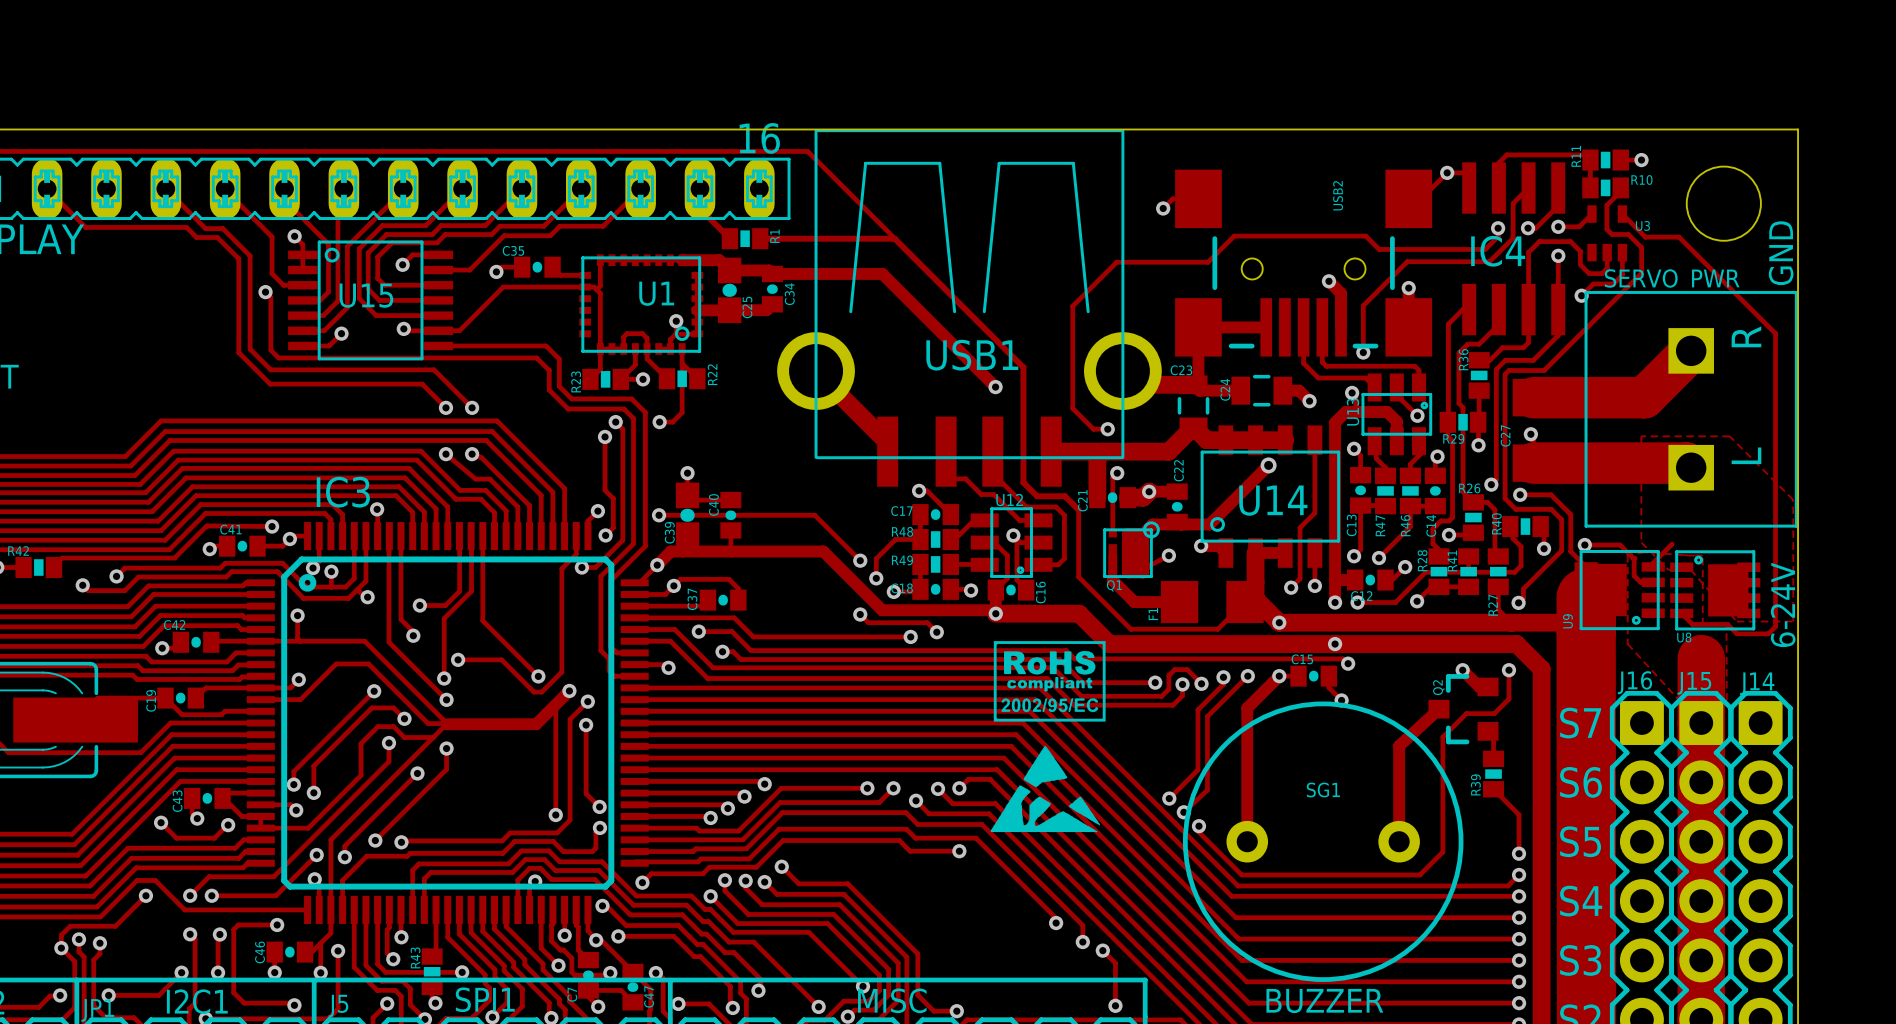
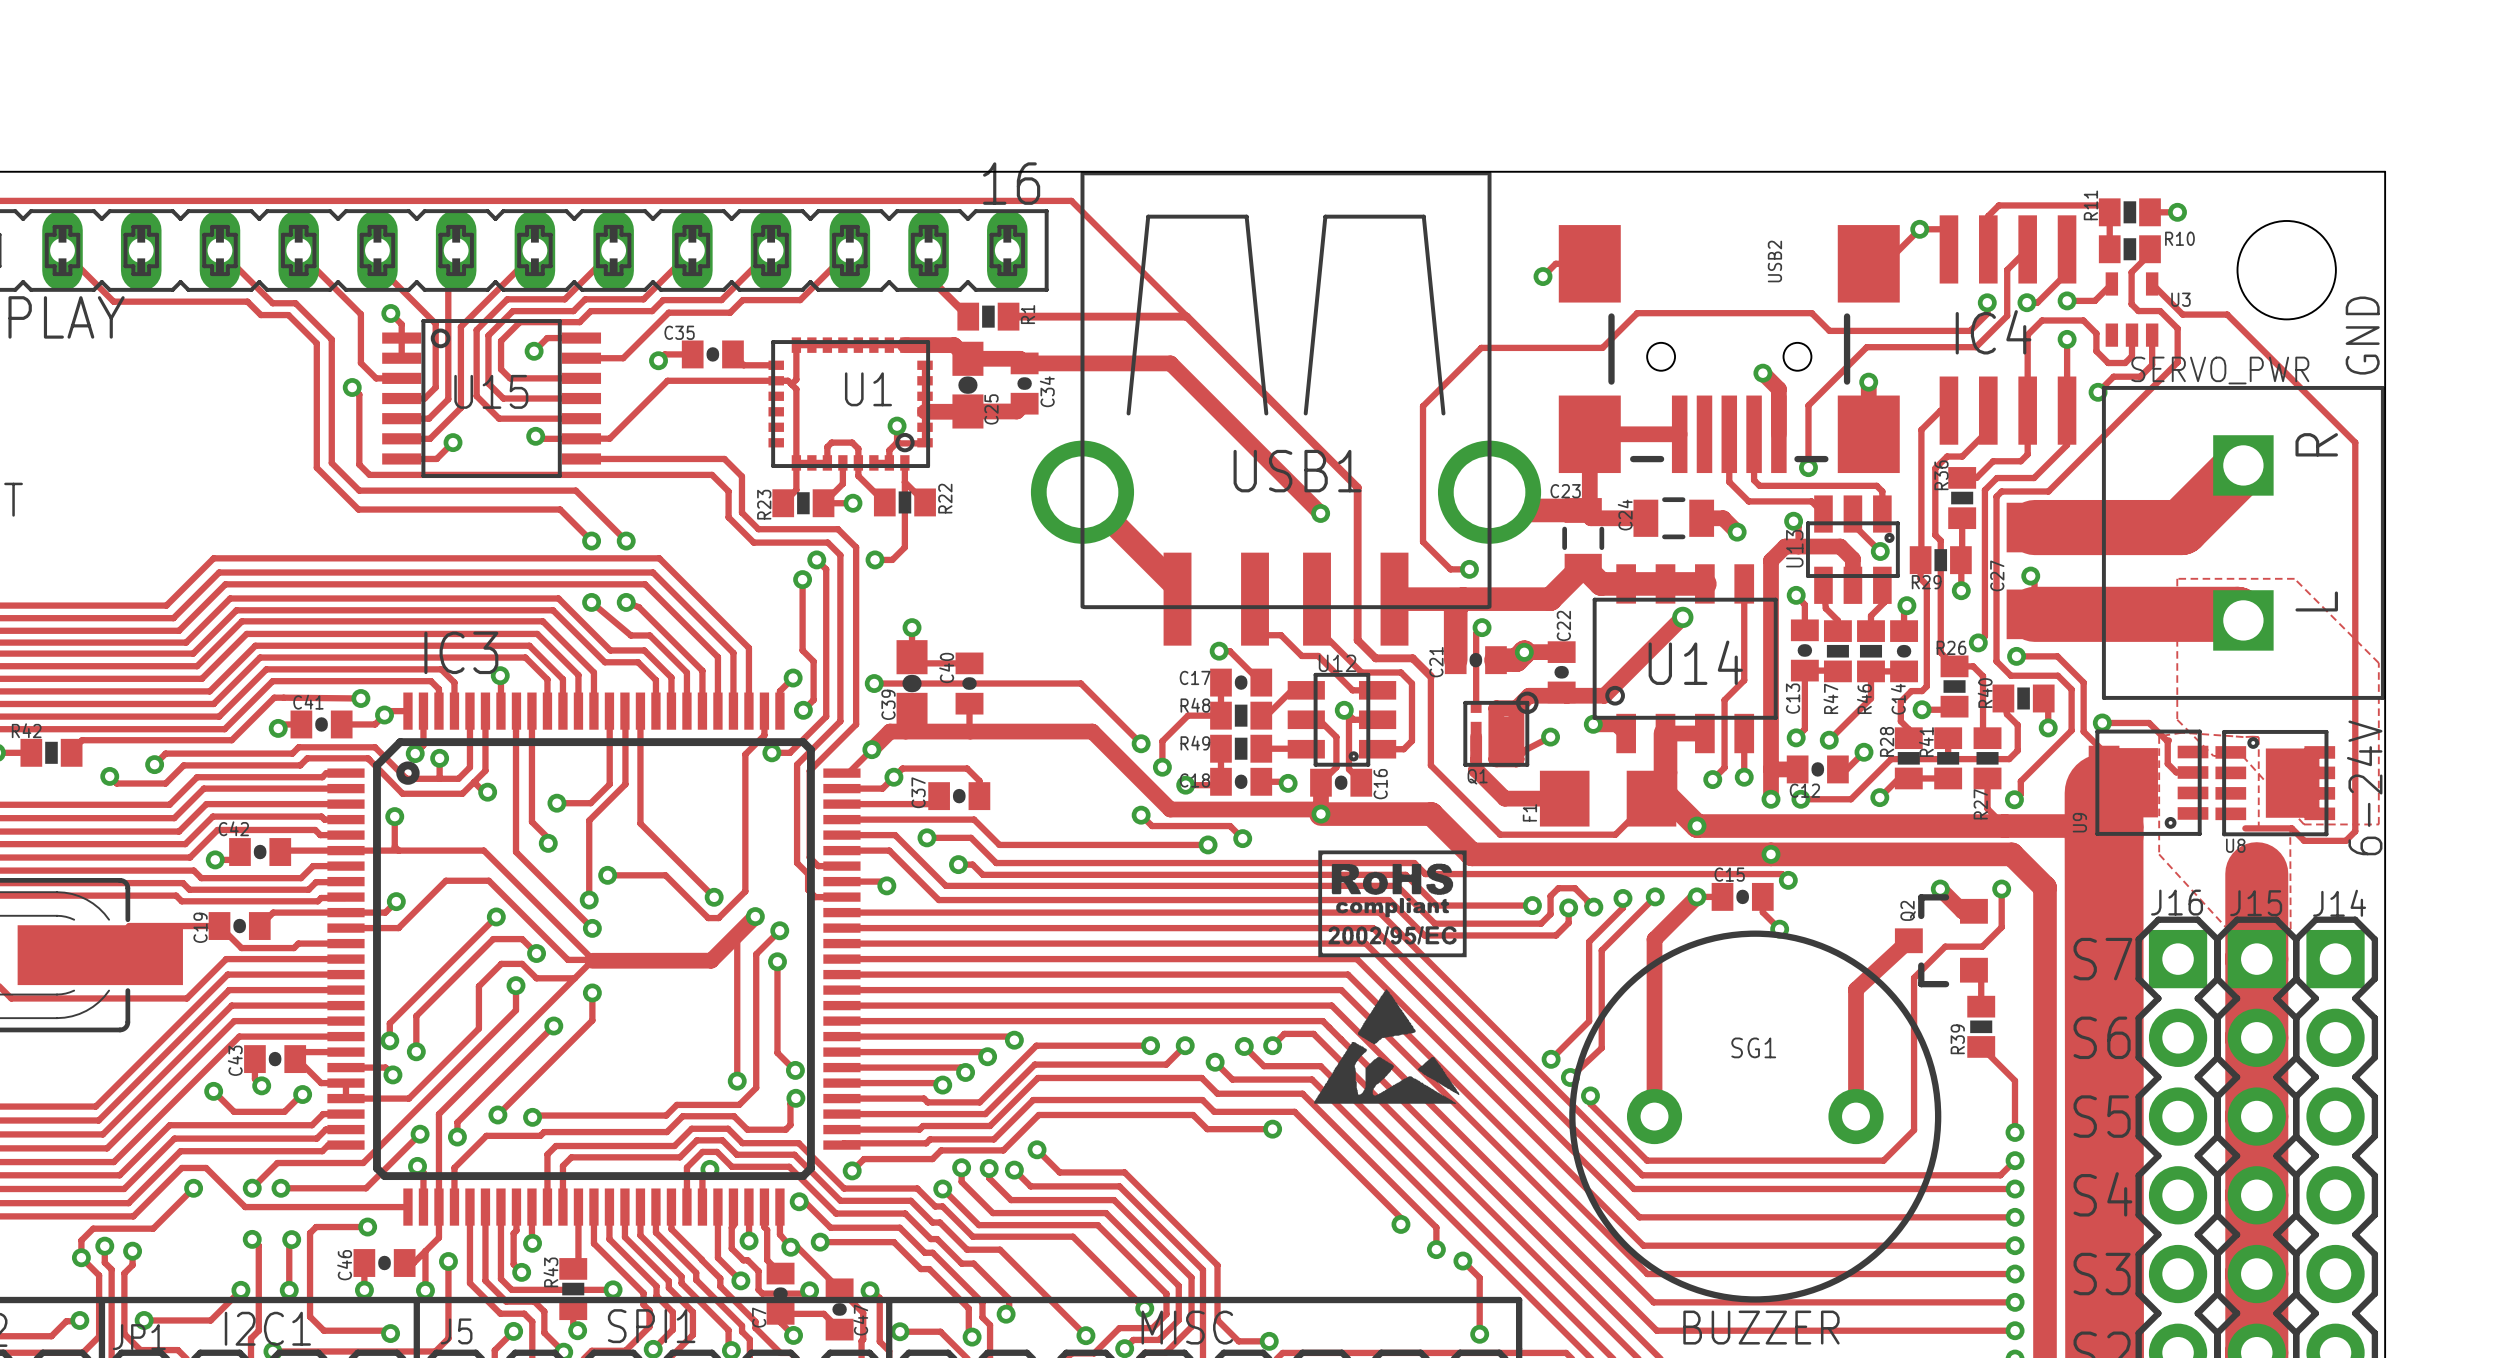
track: (1672, 544) (1653, 563) (1653, 566) -> none
track: (1681, 613) (1692, 624) -> none

